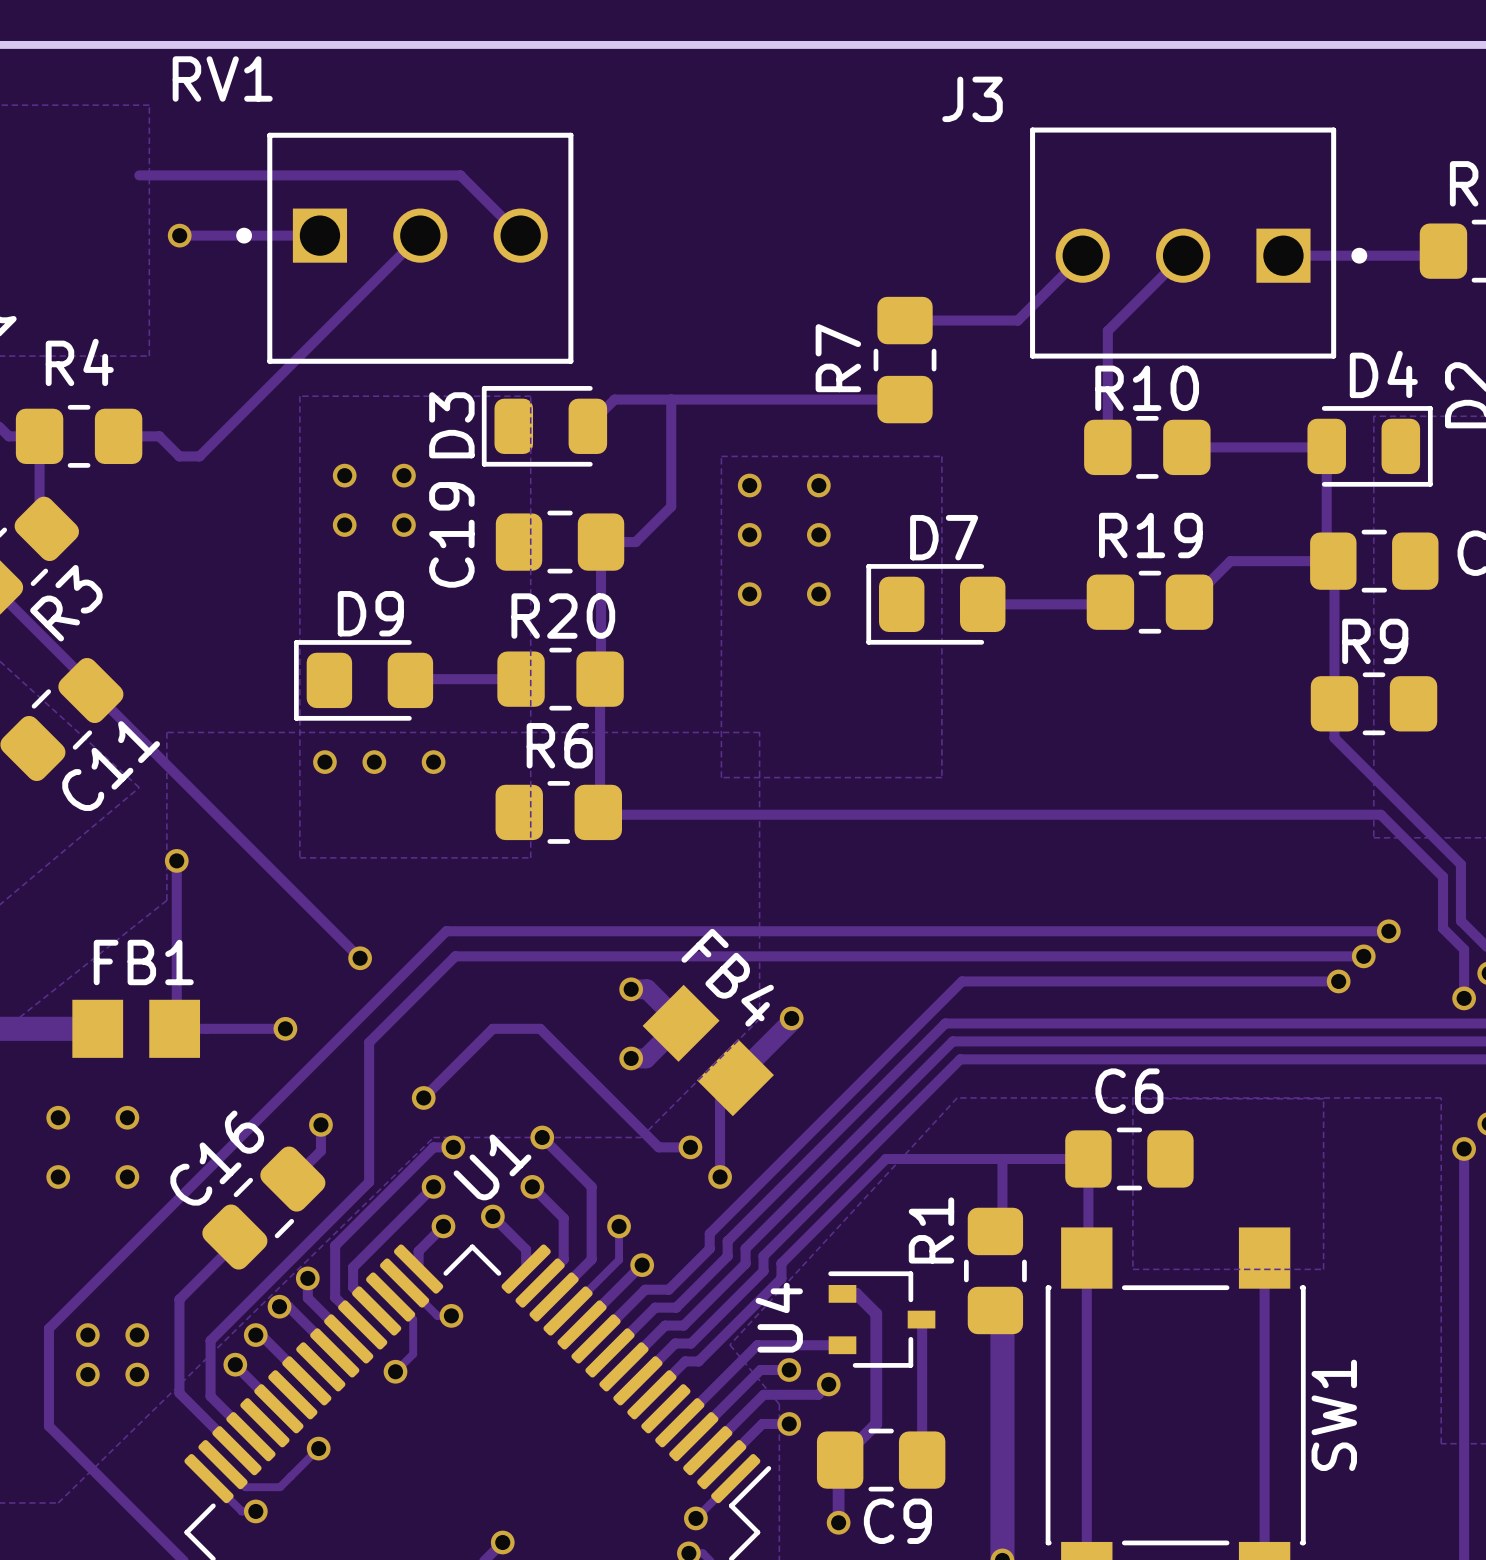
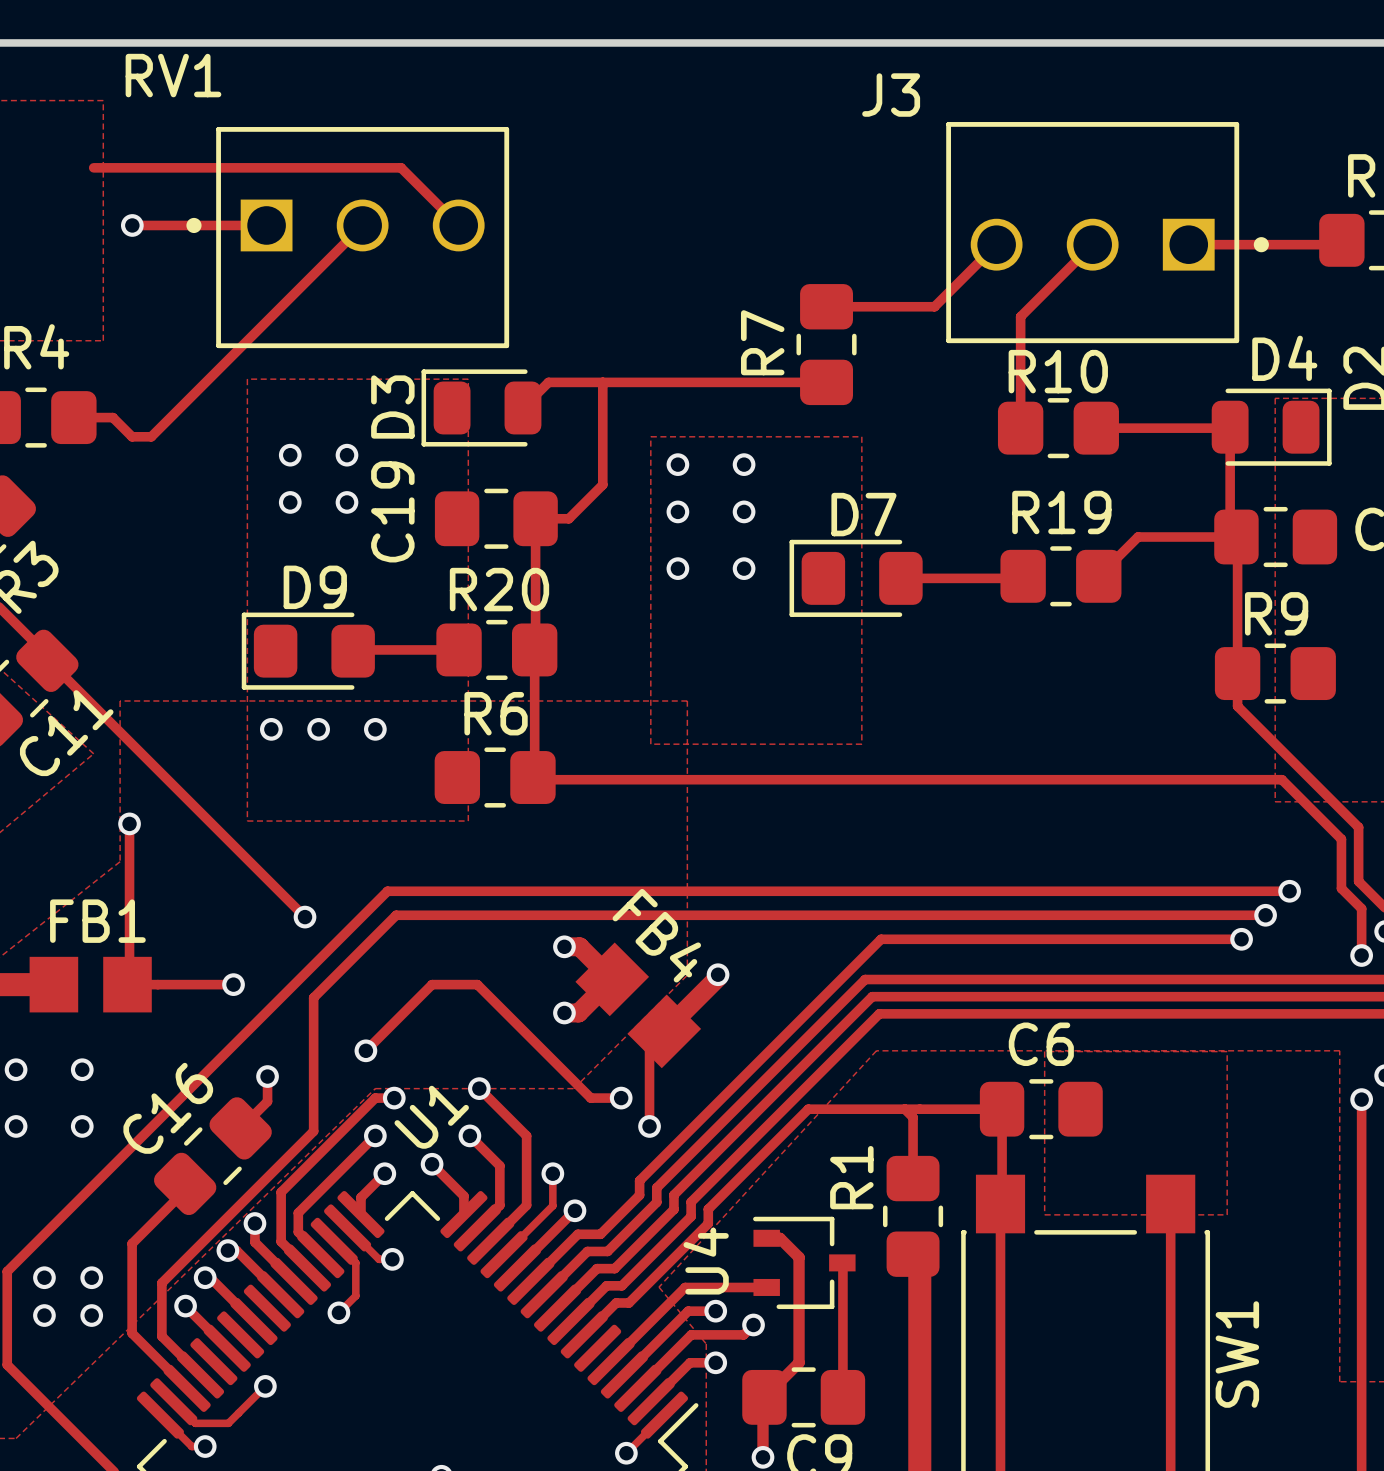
track: none -> (904, 1109) (913, 1117) (913, 1178)
track: (1002, 1158) (1002, 1224) -> none

